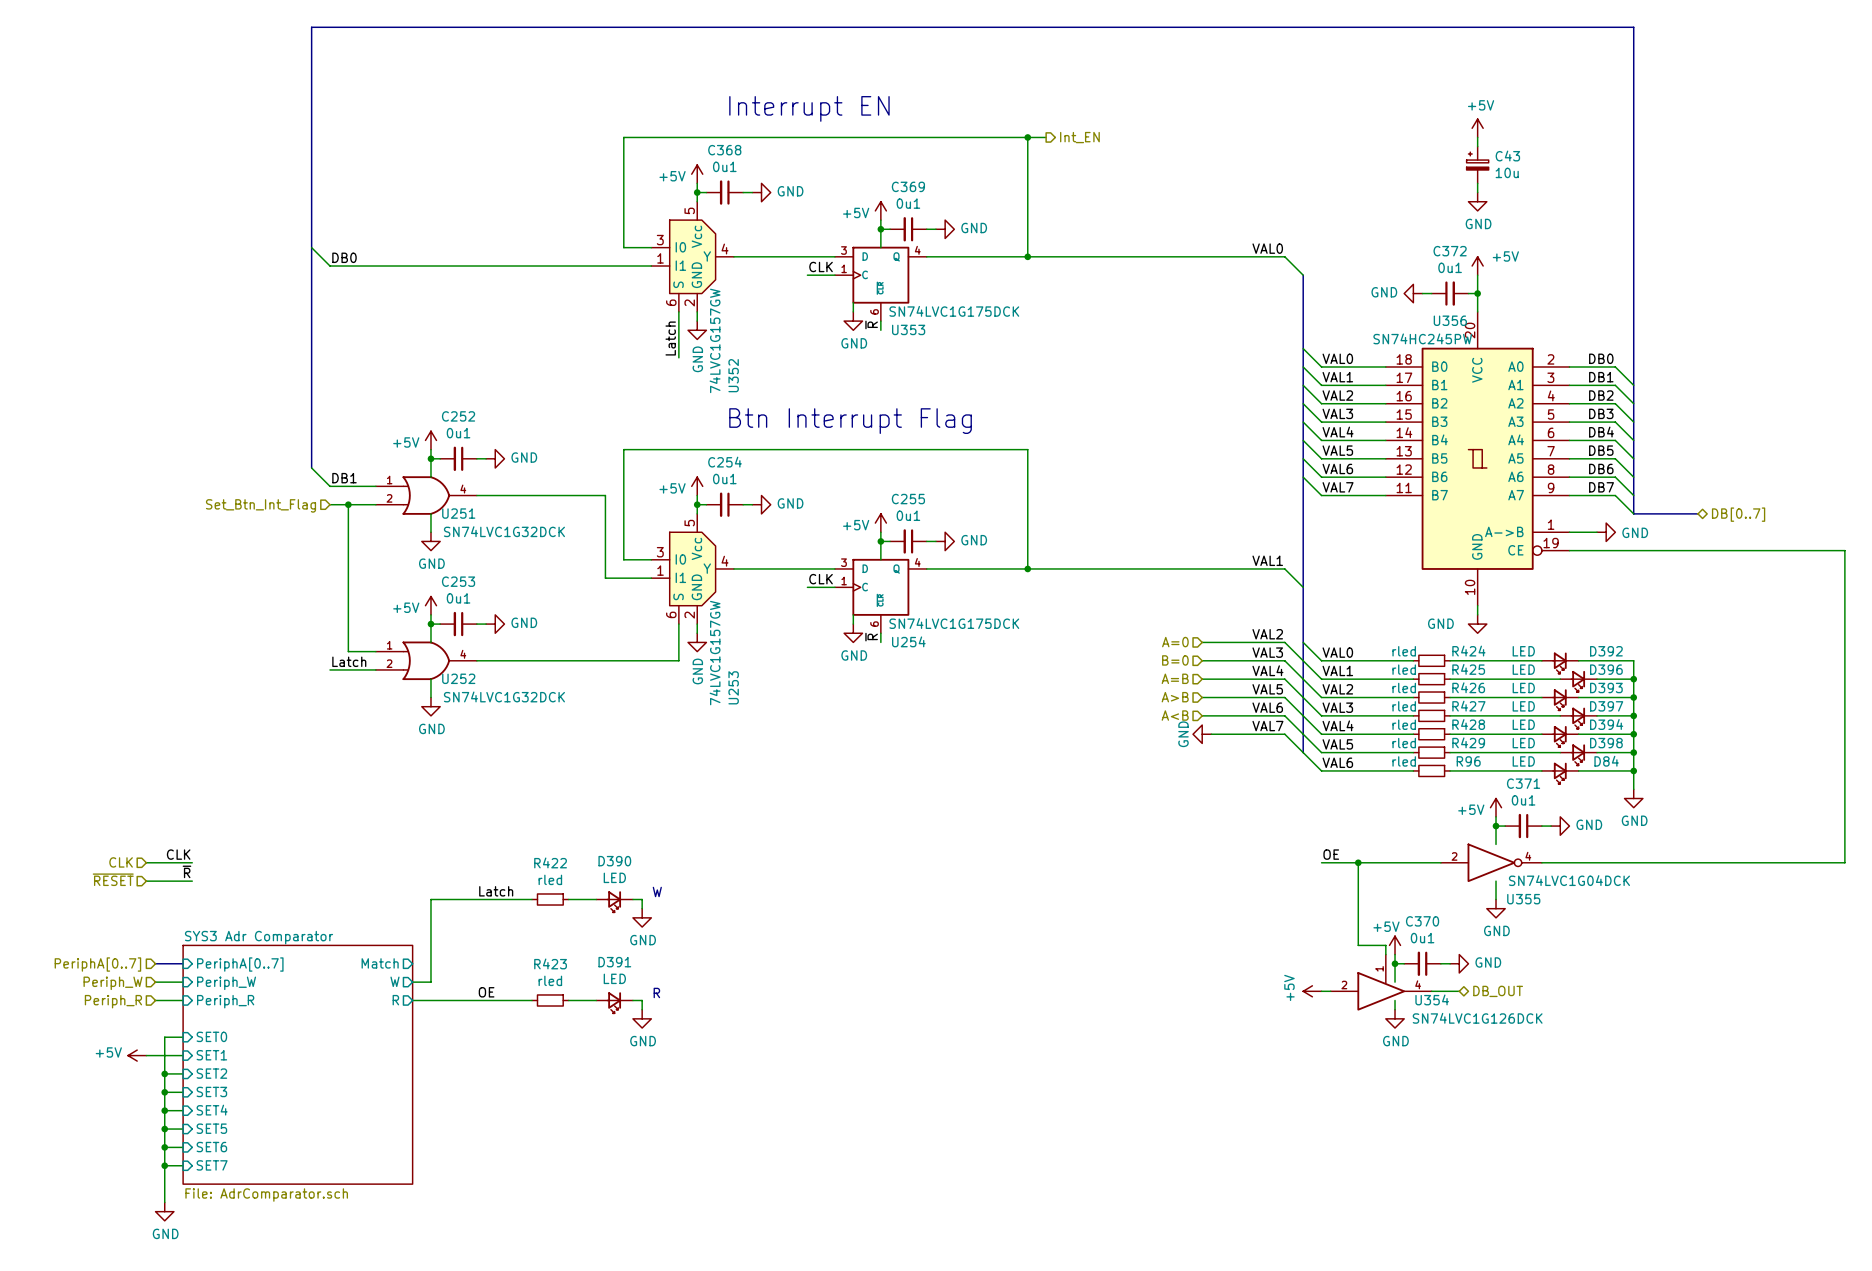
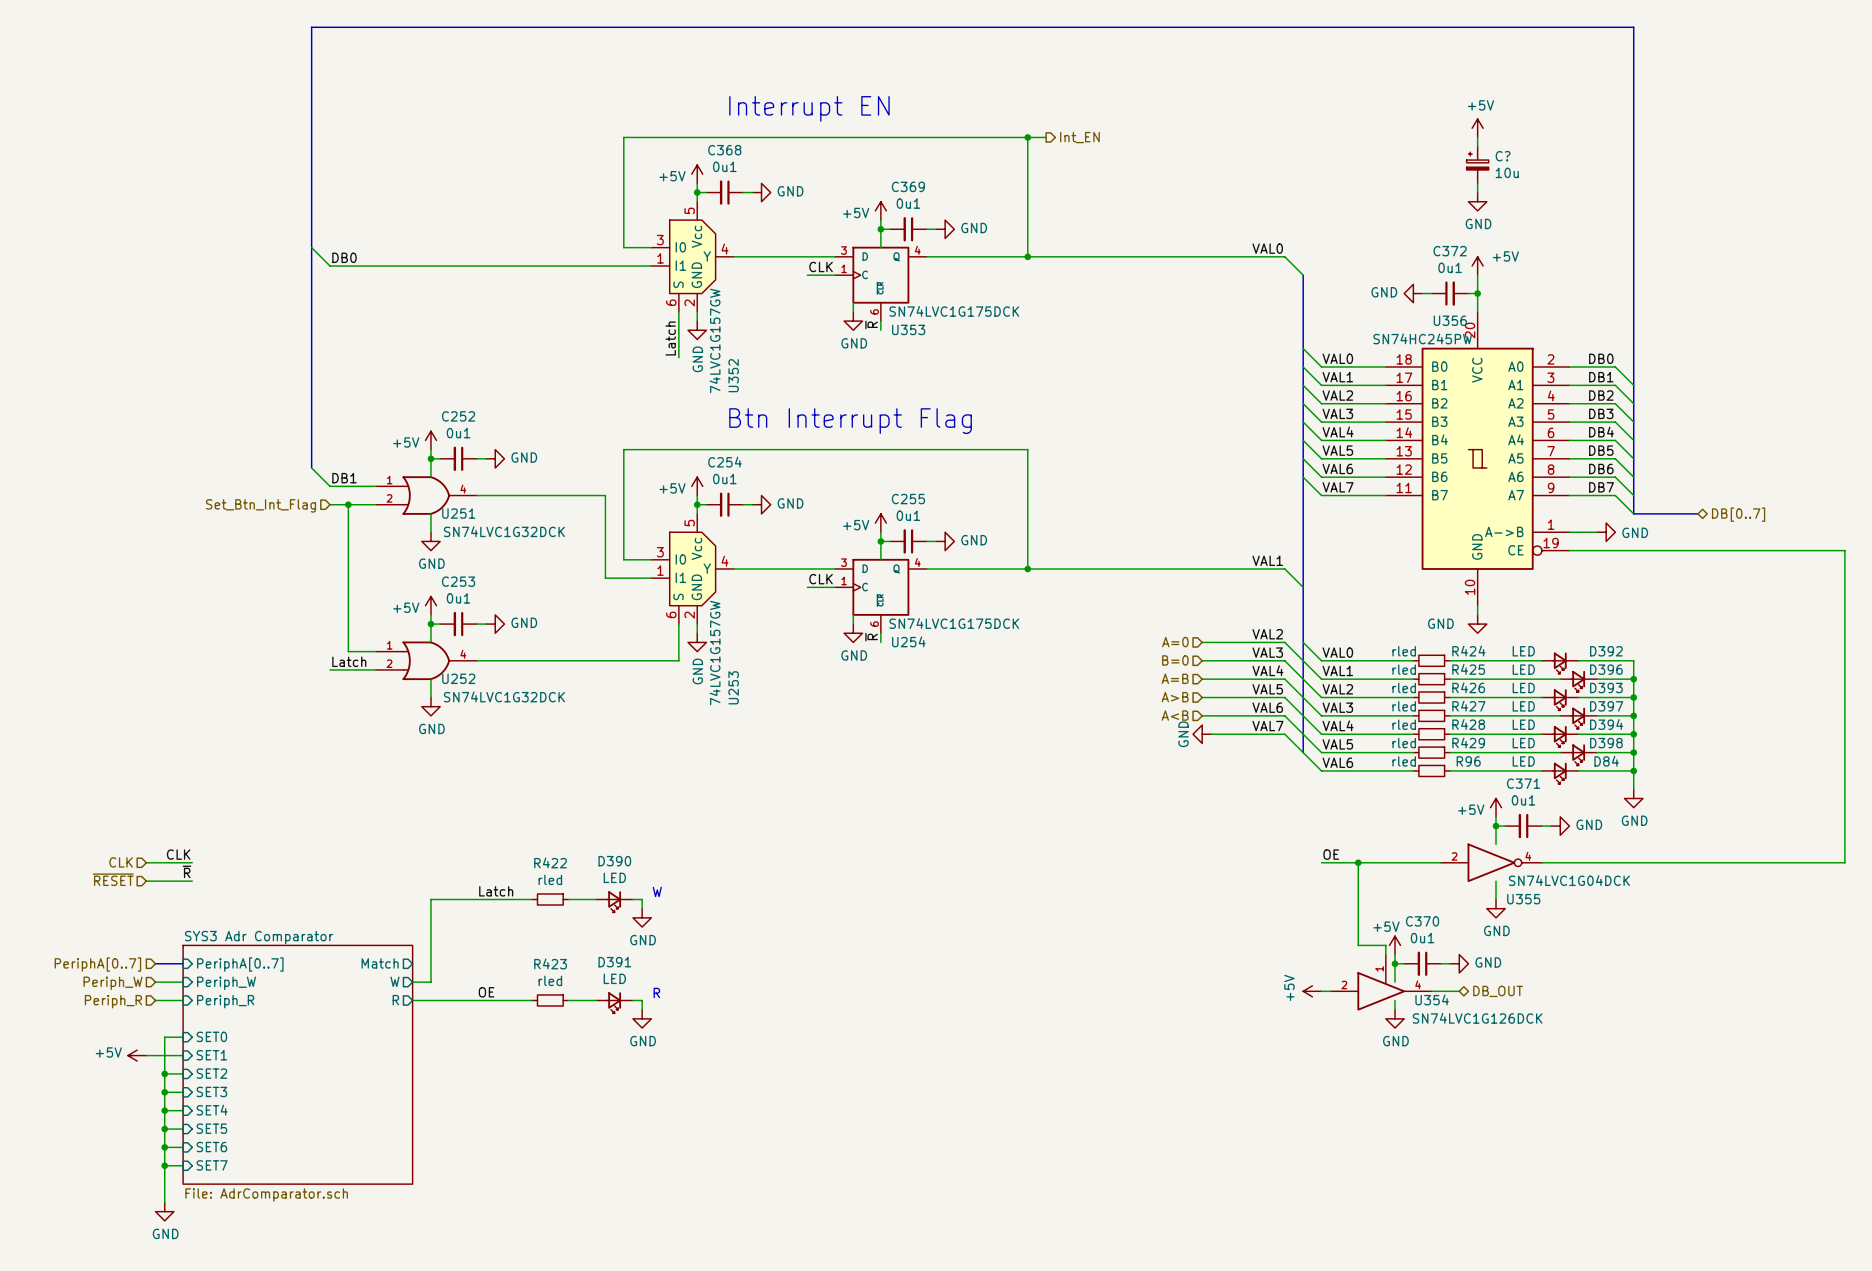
C43 name: C43 (1507, 156) -> C? (1503, 156)

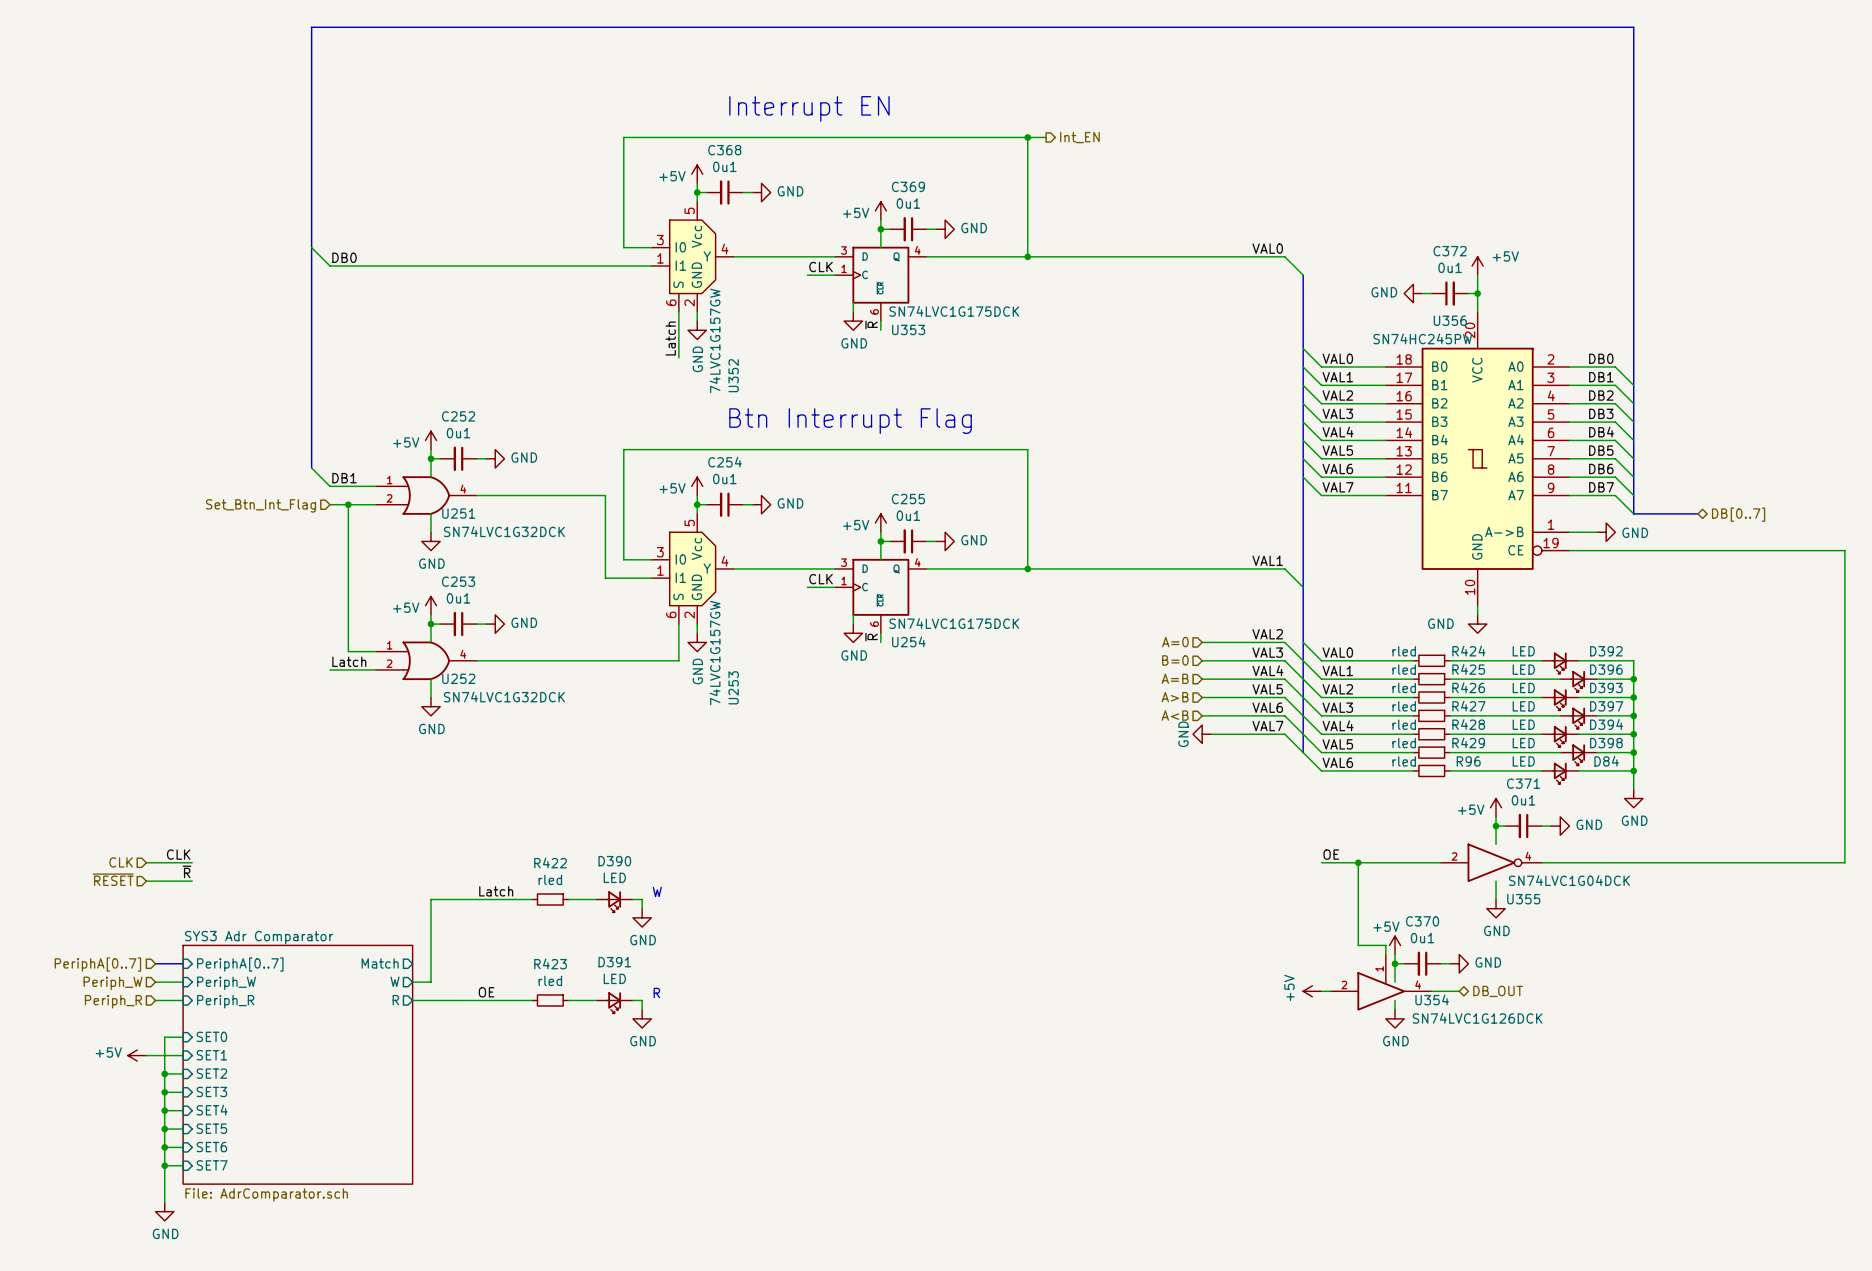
power symbol: +5V (1477, 128) -> none
wire: (1477, 137) (1477, 146) -> none
C?: 10u (1477, 165) -> none
wire: (1477, 183) (1477, 192) -> none
power symbol: GND (1477, 201) -> none

